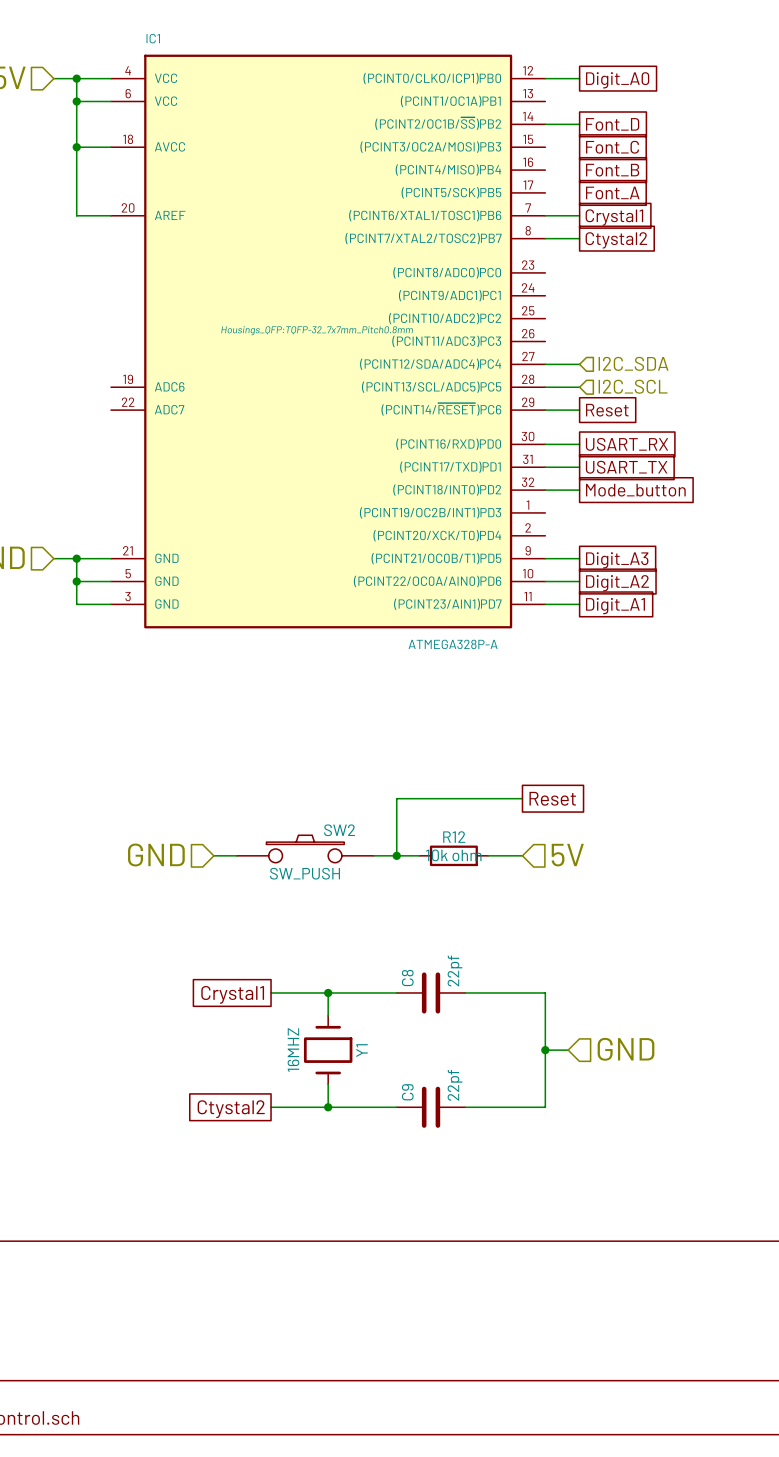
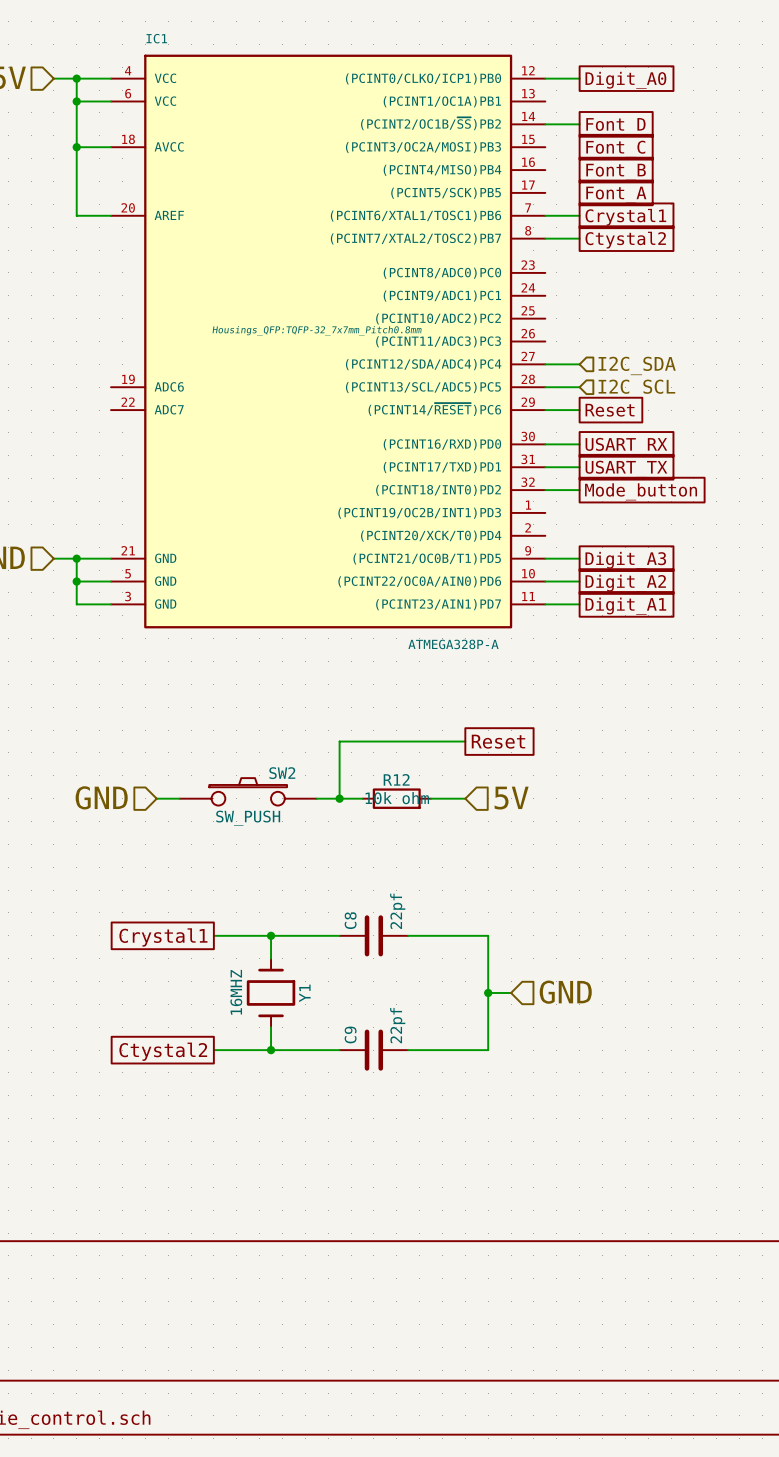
wire: none -> (465, 741) (339, 741) (339, 798)
junction: none -> (339, 798)
wire: (431, 798) (396, 798) (396, 855) -> none
wire: (465, 798) (522, 798) -> none
global label position: Reset (552, 798) -> Reset (498, 741)
SW2 position: (305, 848) -> (248, 791)
hierarchical label position: GND (156, 854) -> GND (101, 797)
wire: (213, 855) (236, 855) -> (156, 798) (179, 798)
wire: (373, 855) (419, 855) -> (316, 798) (362, 798)
junction: (396, 855) -> none
R12 position: (453, 855) -> (396, 798)
wire: (488, 855) (522, 855) -> none
hierarchical label position: 5V (567, 855) -> 5V (511, 798)
junction: none -> (271, 935)
wire: none -> (408, 935) (488, 935) (488, 1050) (408, 1050)
wire: (271, 992) (396, 992) -> (213, 935) (339, 935)
wire: (328, 992) (328, 1015) -> (271, 935) (271, 958)
junction: (328, 992) -> none
C8 position: (431, 992) -> (373, 935)
wire: (465, 992) (488, 992) -> none
junction: none -> (488, 992)
wire: (511, 992) (545, 992) (545, 1107) (465, 1107) -> none
global label position: Crystal1 (232, 994) -> Crystal1 (163, 937)
hierarchical label position: GND (626, 1049) -> GND (565, 992)
junction: none -> (271, 1050)
Y1 position: (328, 1050) -> (271, 992)
wire: (545, 1050) (568, 1050) -> none
junction: (545, 1050) -> none
wire: (328, 1084) (328, 1107) -> (271, 1027) (271, 1050)
wire: (271, 1107) (396, 1107) -> (213, 1050) (339, 1050)
junction: (328, 1107) -> none
C9 position: (431, 1107) -> (373, 1050)
global label position: Ctystal2 (231, 1109) -> Ctystal2 (163, 1051)

